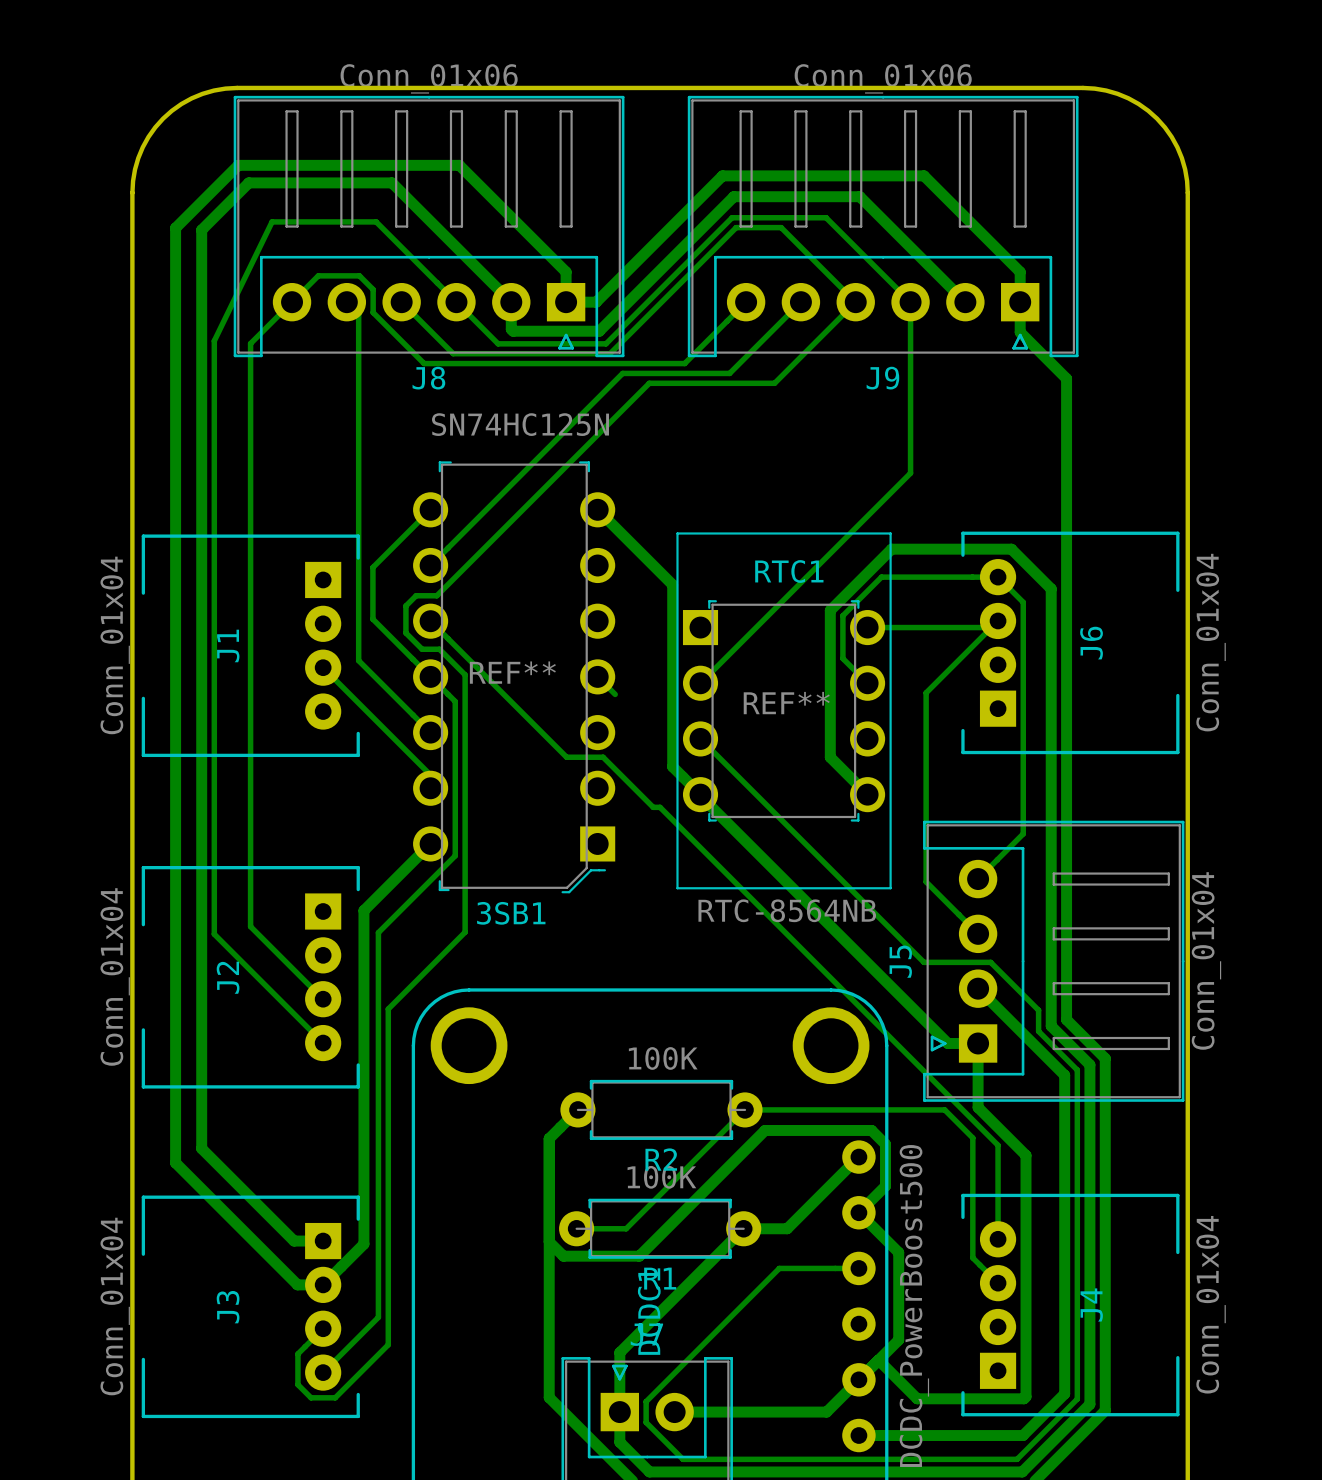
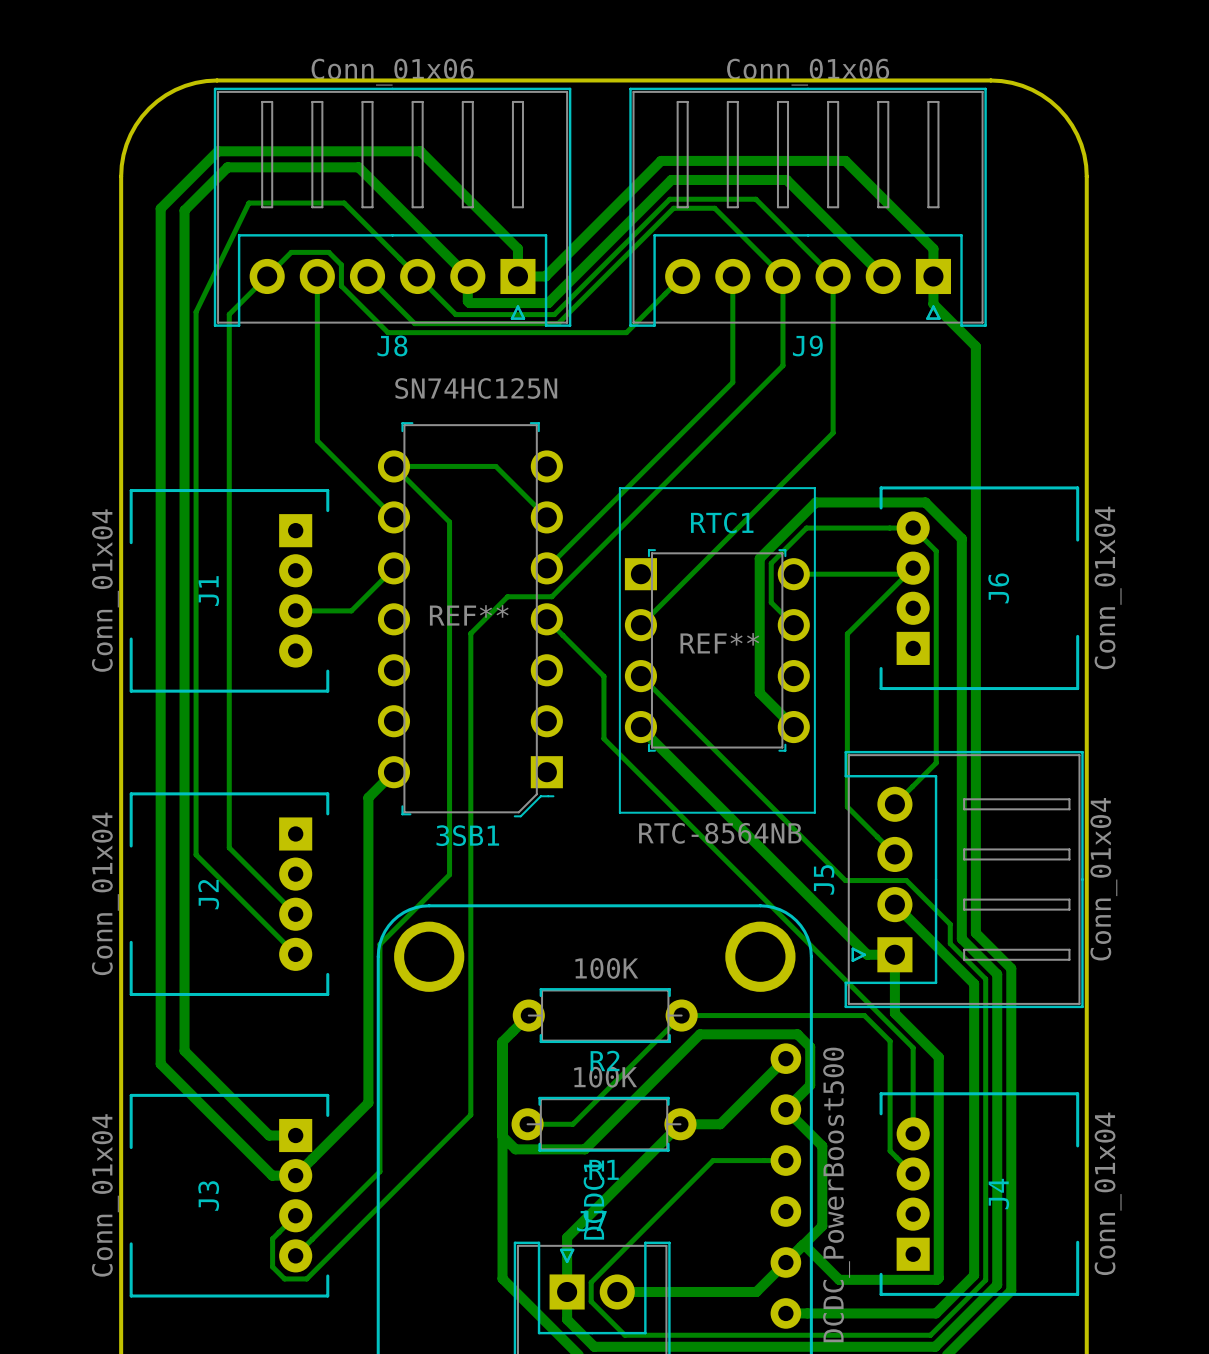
bottom track: (346, 302) (358, 314) (358, 660) (430, 732) -> (317, 276) (317, 440) (393, 517)
bottom track: (800, 302) (729, 373) (622, 373) (430, 565) -> (732, 276) (732, 382) (546, 568)
bottom track: (855, 302) (774, 383) (649, 383) (436, 595) (416, 595) (405, 605) (405, 633) (422, 649) (439, 649) (465, 674) (465, 932) (388, 1009) (388, 1344) -> (782, 276) (782, 365) (551, 596) (507, 596) (470, 633) (470, 1114) (355, 1230)
bottom track: (430, 509) (372, 567) (372, 619) (455, 701) (455, 855) (378, 932) (378, 1317) -> (546, 517) (495, 466) (393, 466) (449, 522) (449, 874) (379, 944) (379, 1171) (346, 1205)
bottom track: (597, 509) (672, 584) (672, 766) (700, 794) -> none
bottom track: (430, 621) (566, 757) (603, 757) (653, 807) (660, 807) -> (562, 635) (603, 676) (603, 738)
bottom track: (323, 667) (430, 775) (430, 788) -> (295, 610) (351, 610) (393, 568)
bottom track: (402, 871) (363, 910) (363, 1244) -> (368, 797) (368, 1102) (332, 1138)

